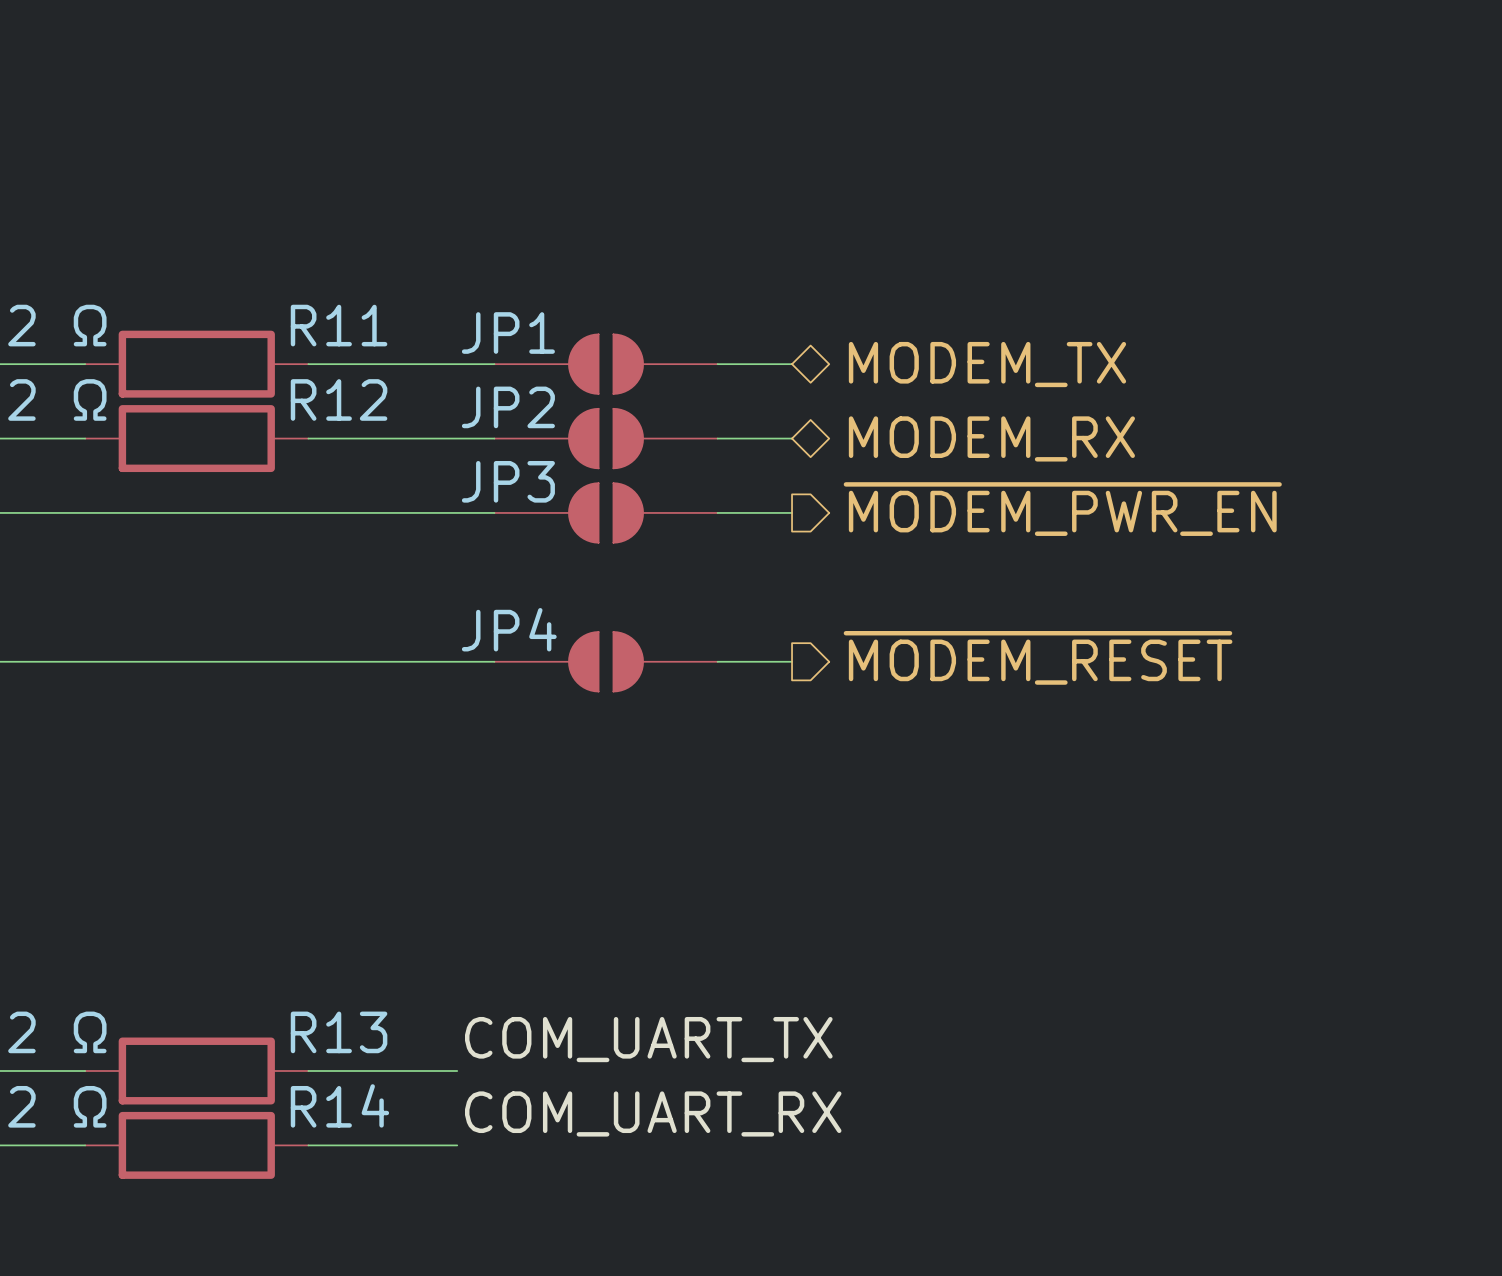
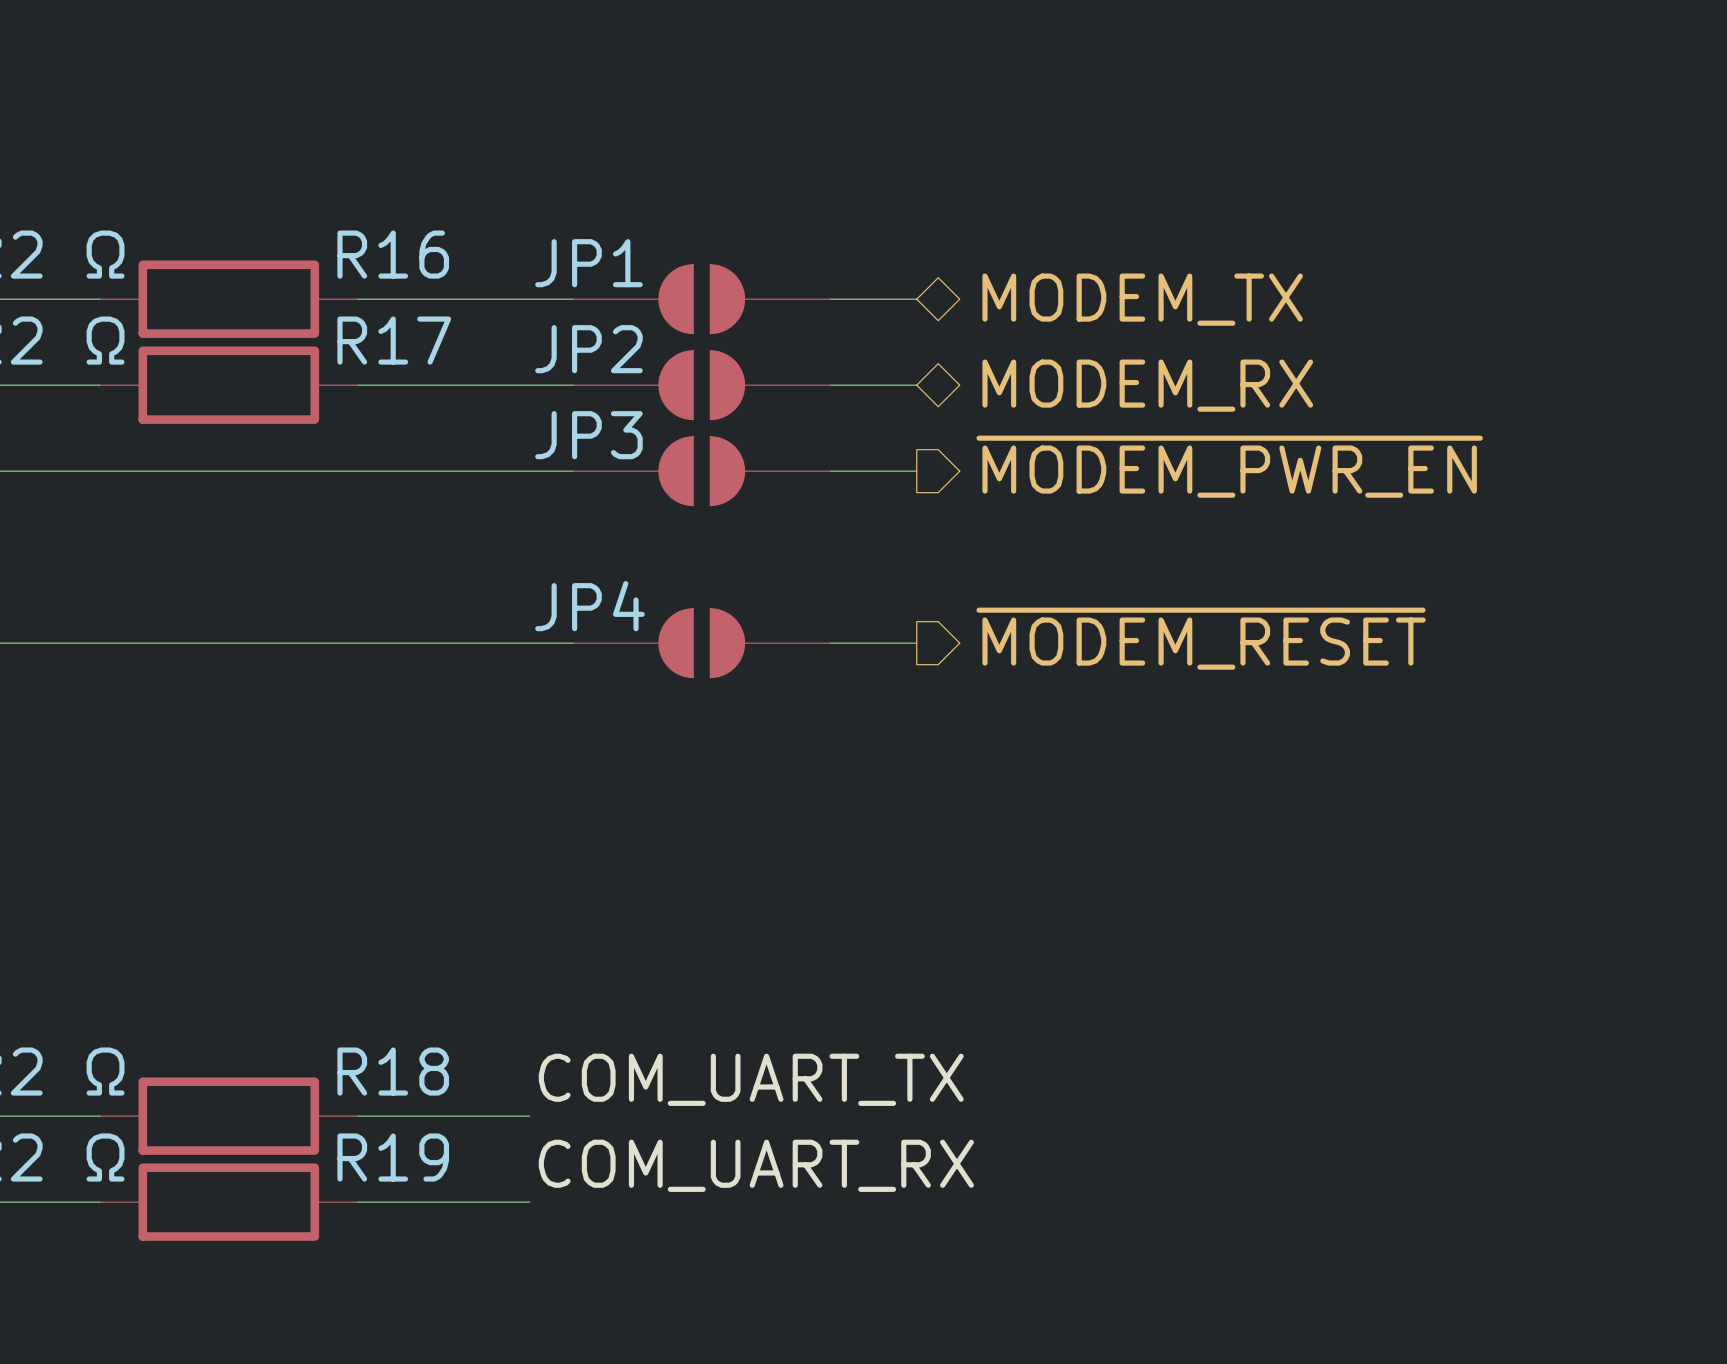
R11 name: R11 (339, 325) -> R16 (393, 254)
R12 name: R12 (339, 399) -> R17 (394, 340)
R13 name: R13 (339, 1032) -> R18 (393, 1071)
R14 name: R14 (339, 1105) -> R19 (393, 1157)

